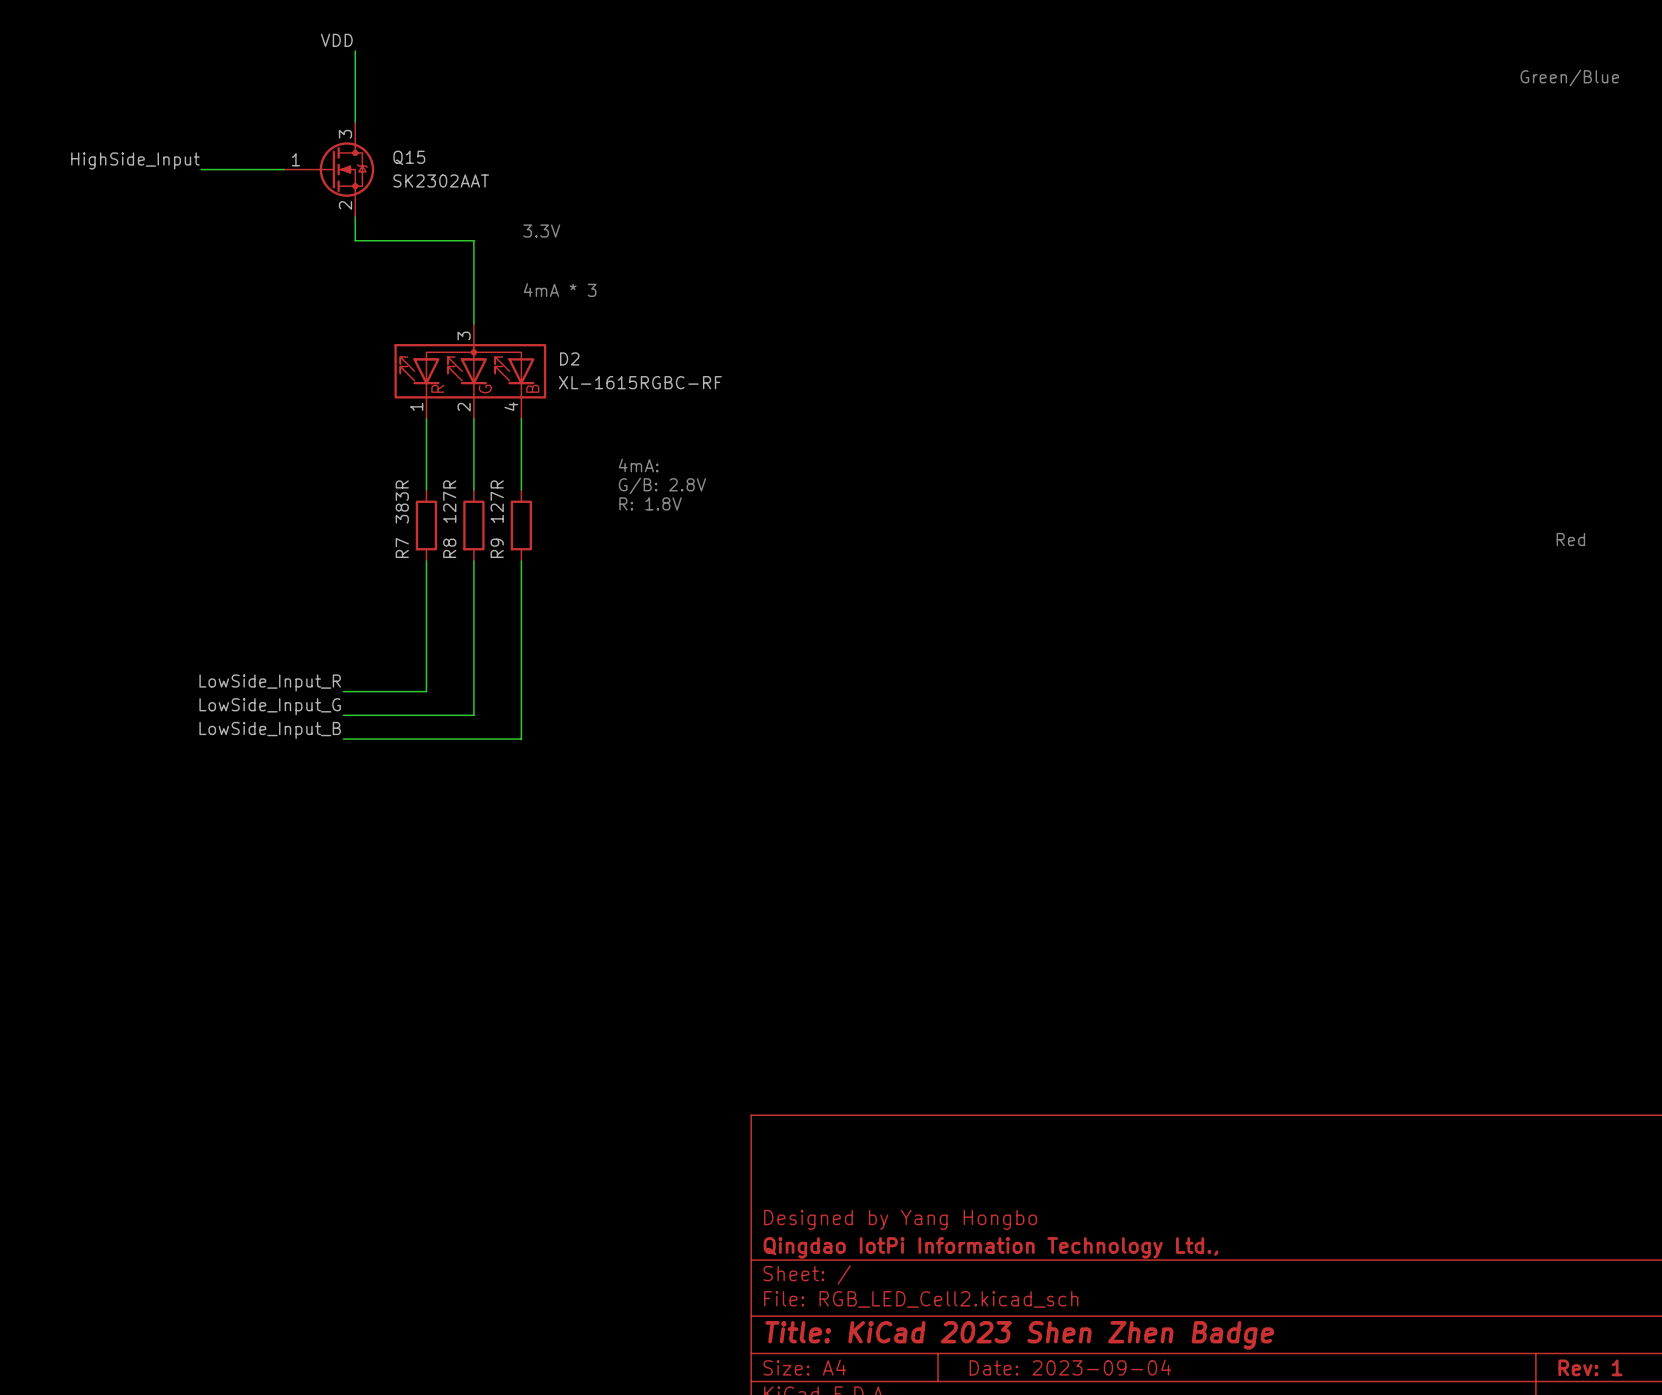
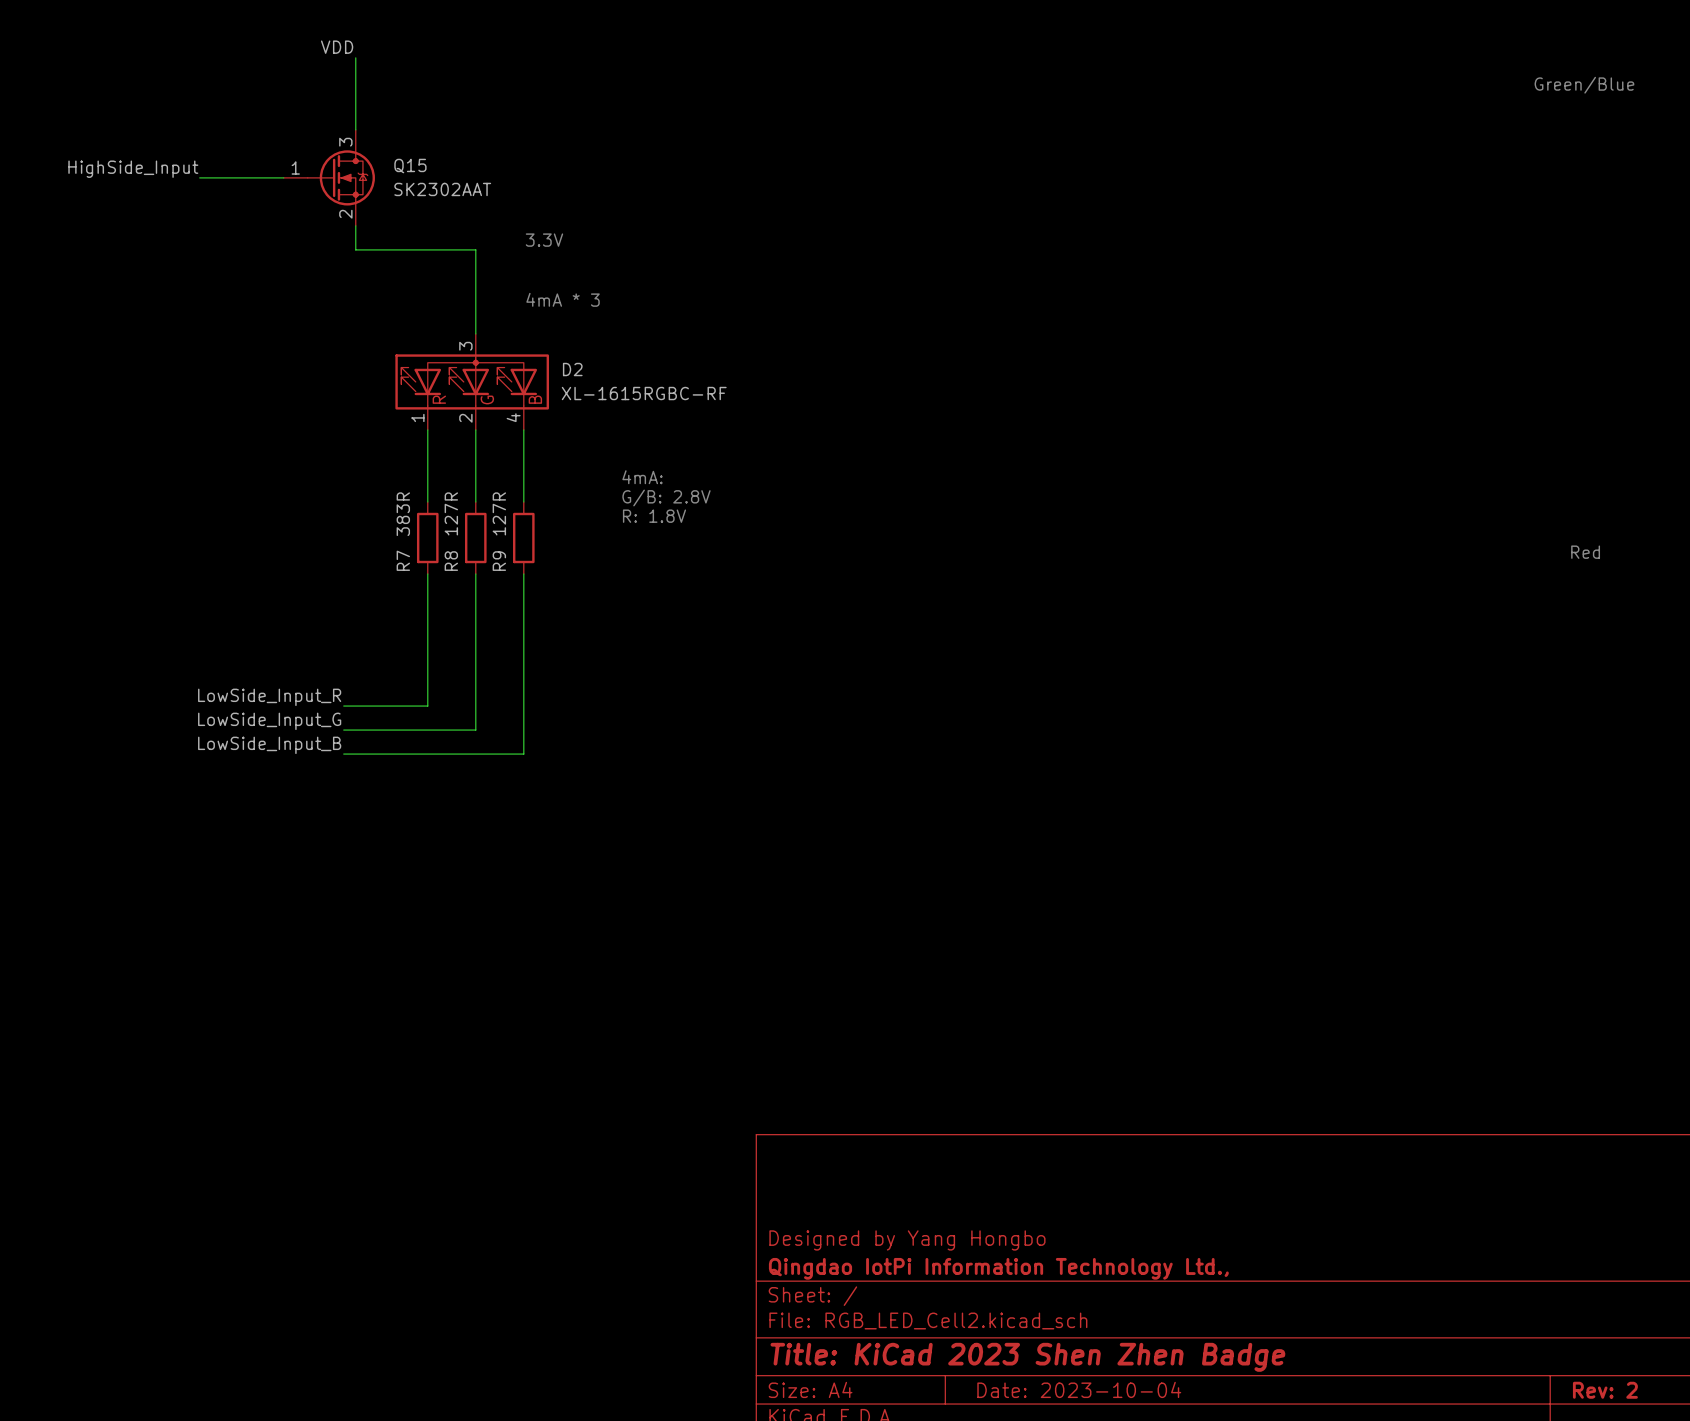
title block: Date: 2023-09-04 (1070, 1367) -> Date: 2023-10-04 (1079, 1389)
title block: Rev: 1 (1590, 1367) -> Rev: 2 (1605, 1390)

